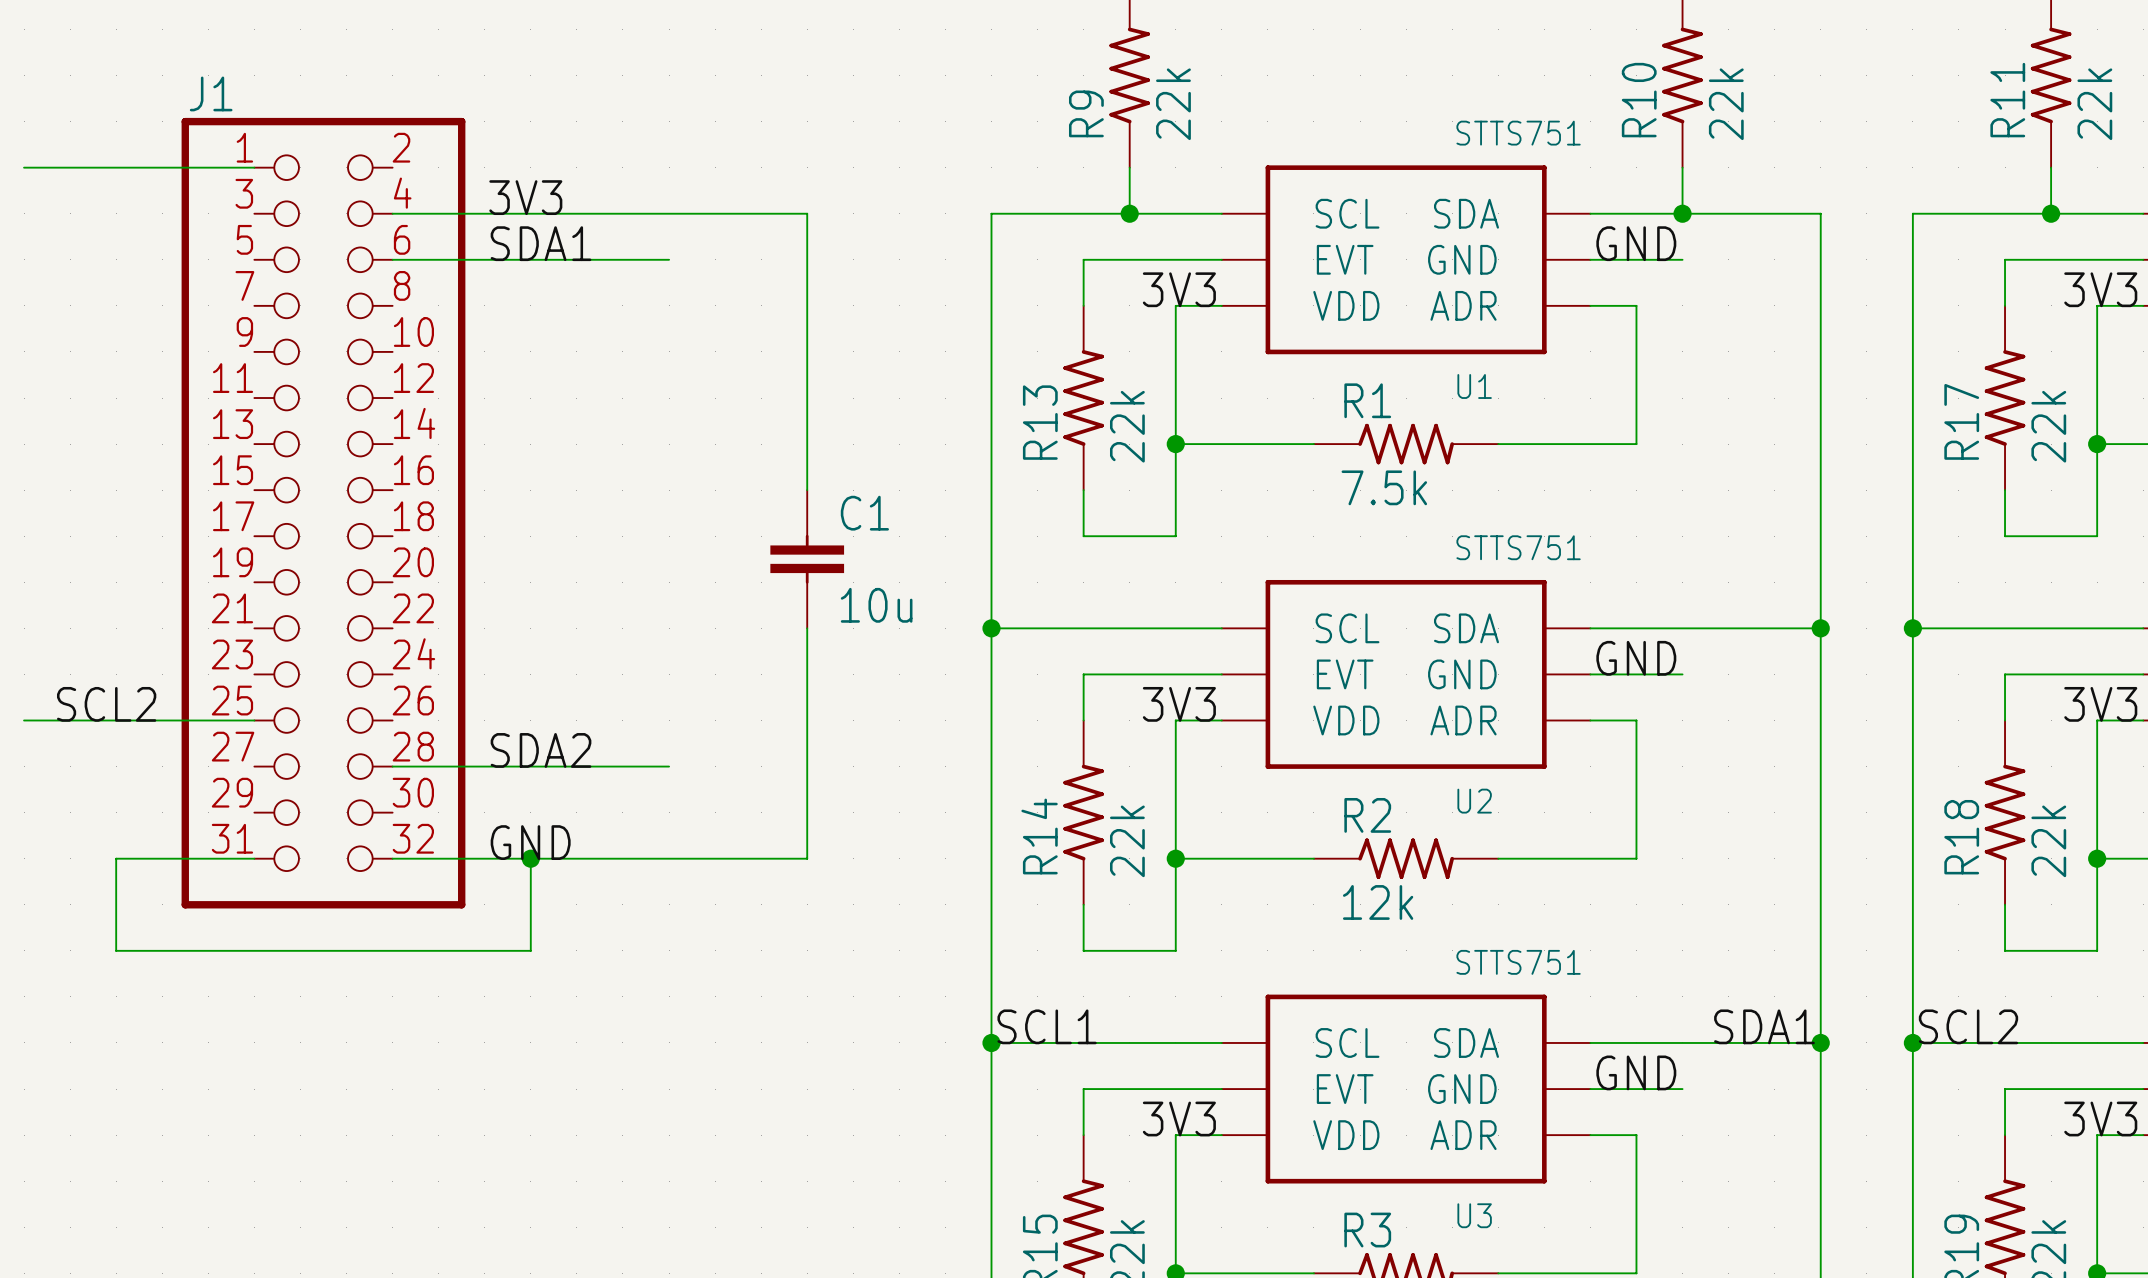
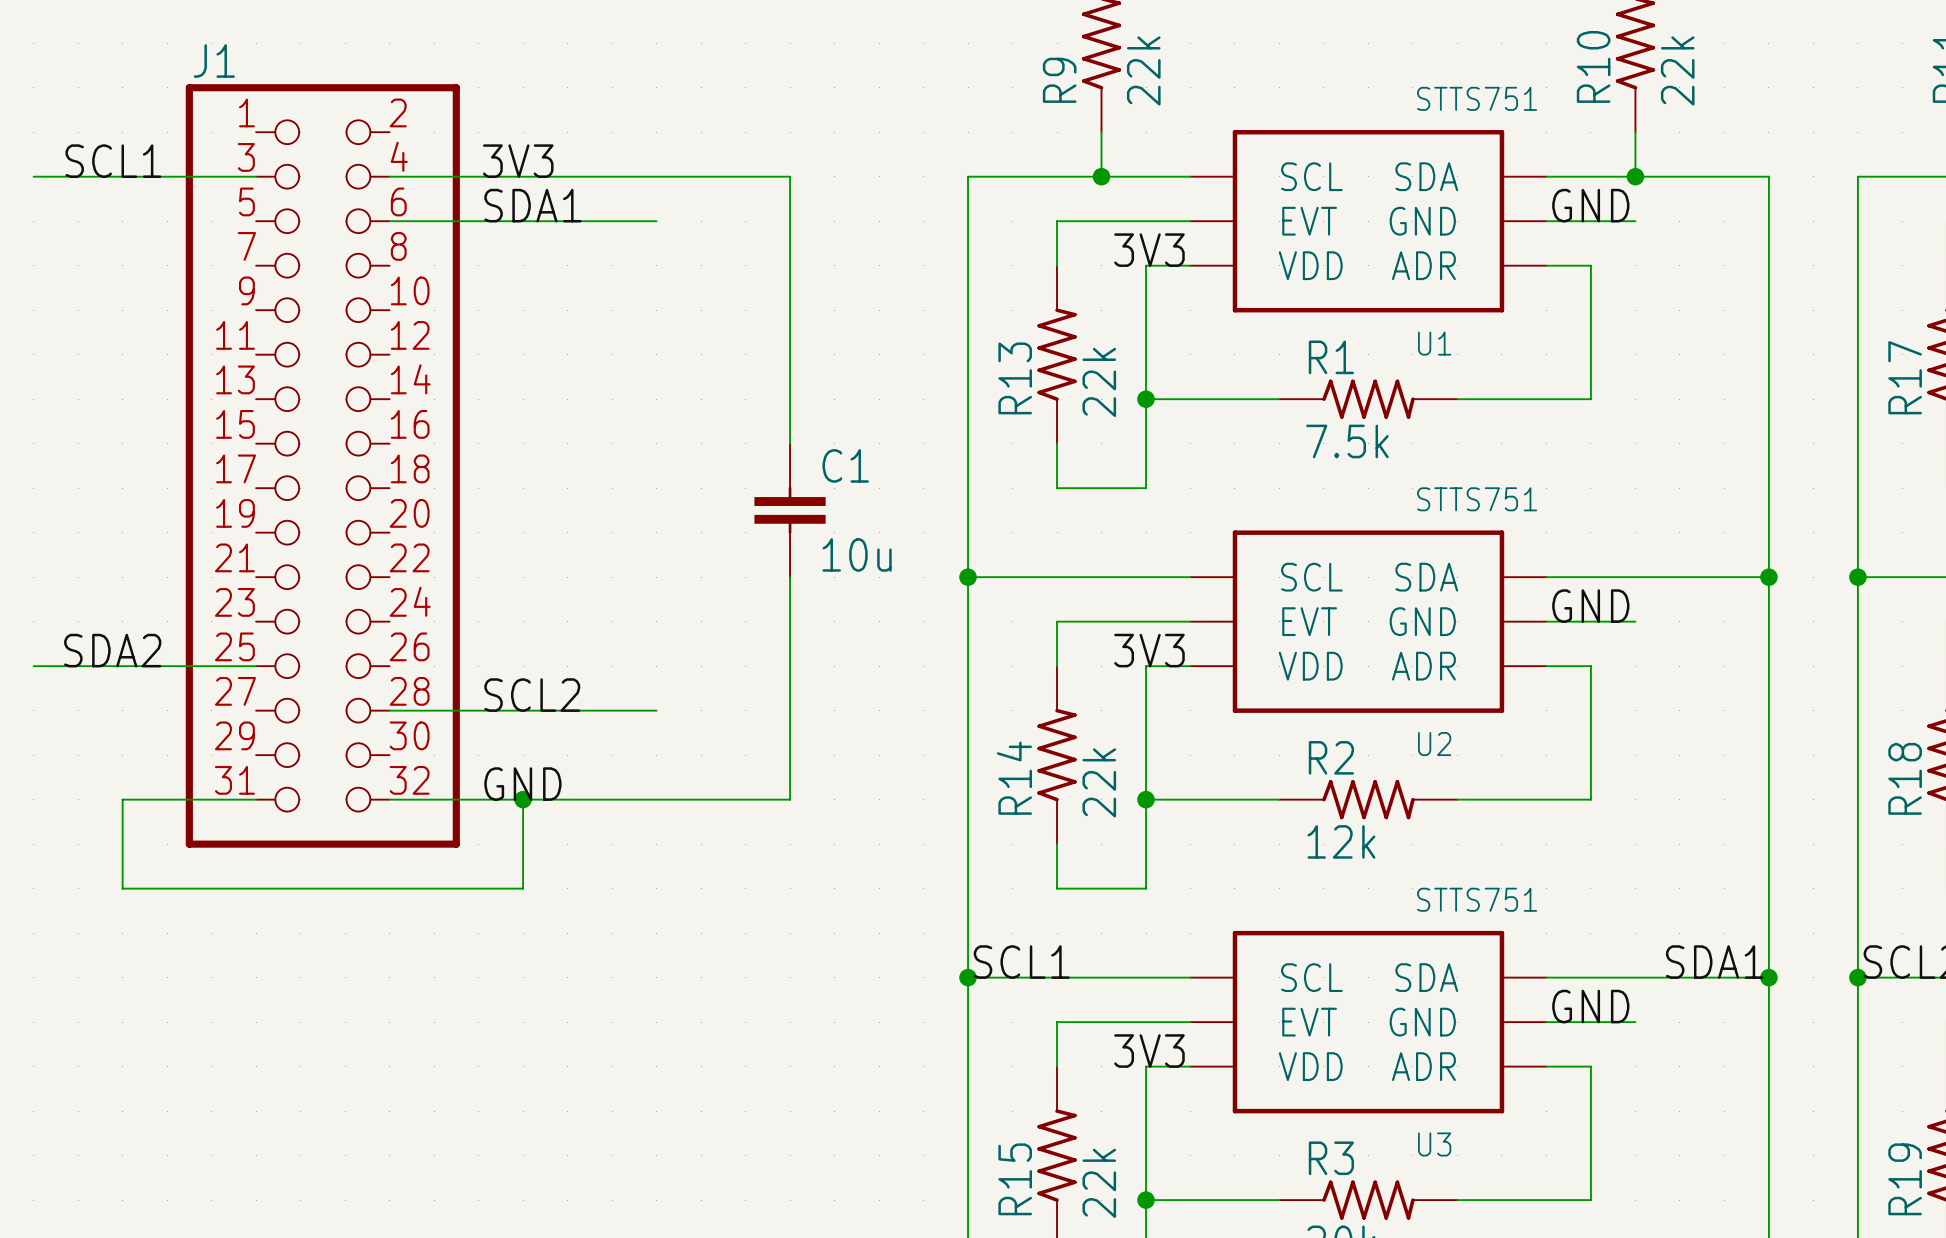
wire: (24, 167) (254, 167) -> (33, 176) (256, 176)
label: none -> SCL1 (113, 161)
label: SCL2 (106, 704) -> SDA2 (112, 650)
label: SDA2 (541, 750) -> SCL2 (532, 695)

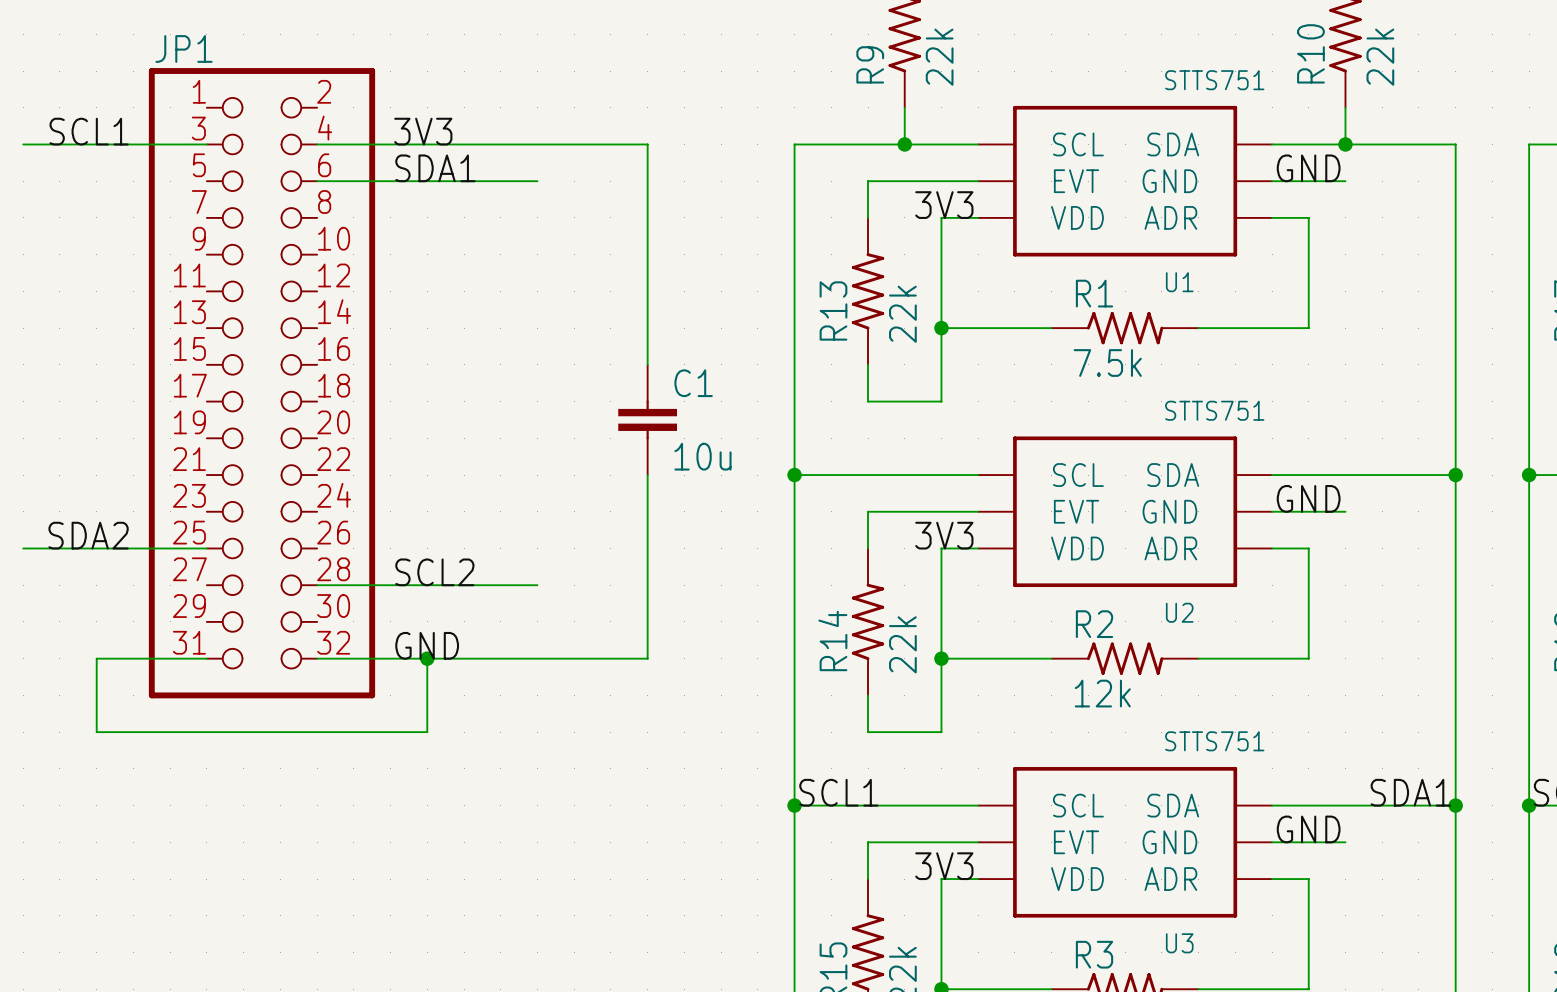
J1 name: J1 (214, 61) -> JP1 (184, 48)

